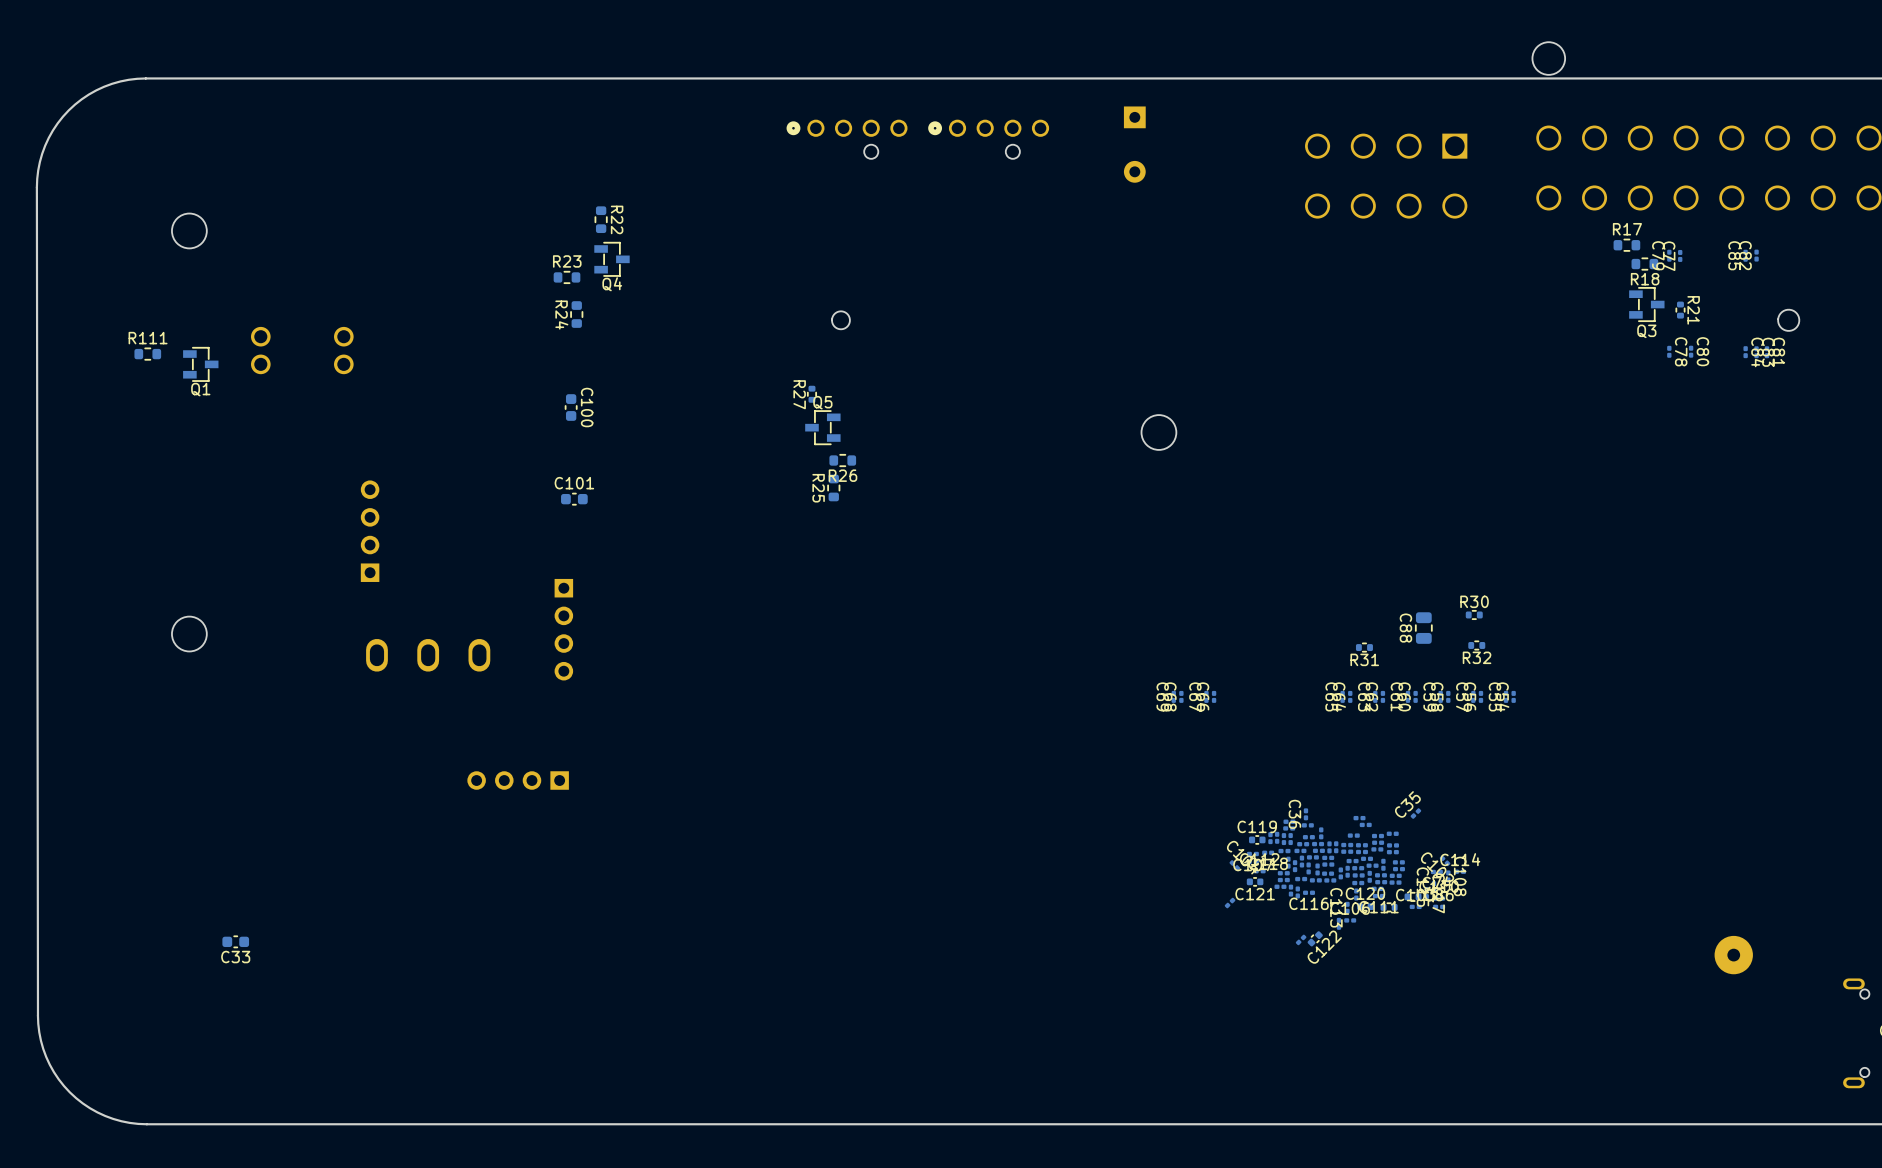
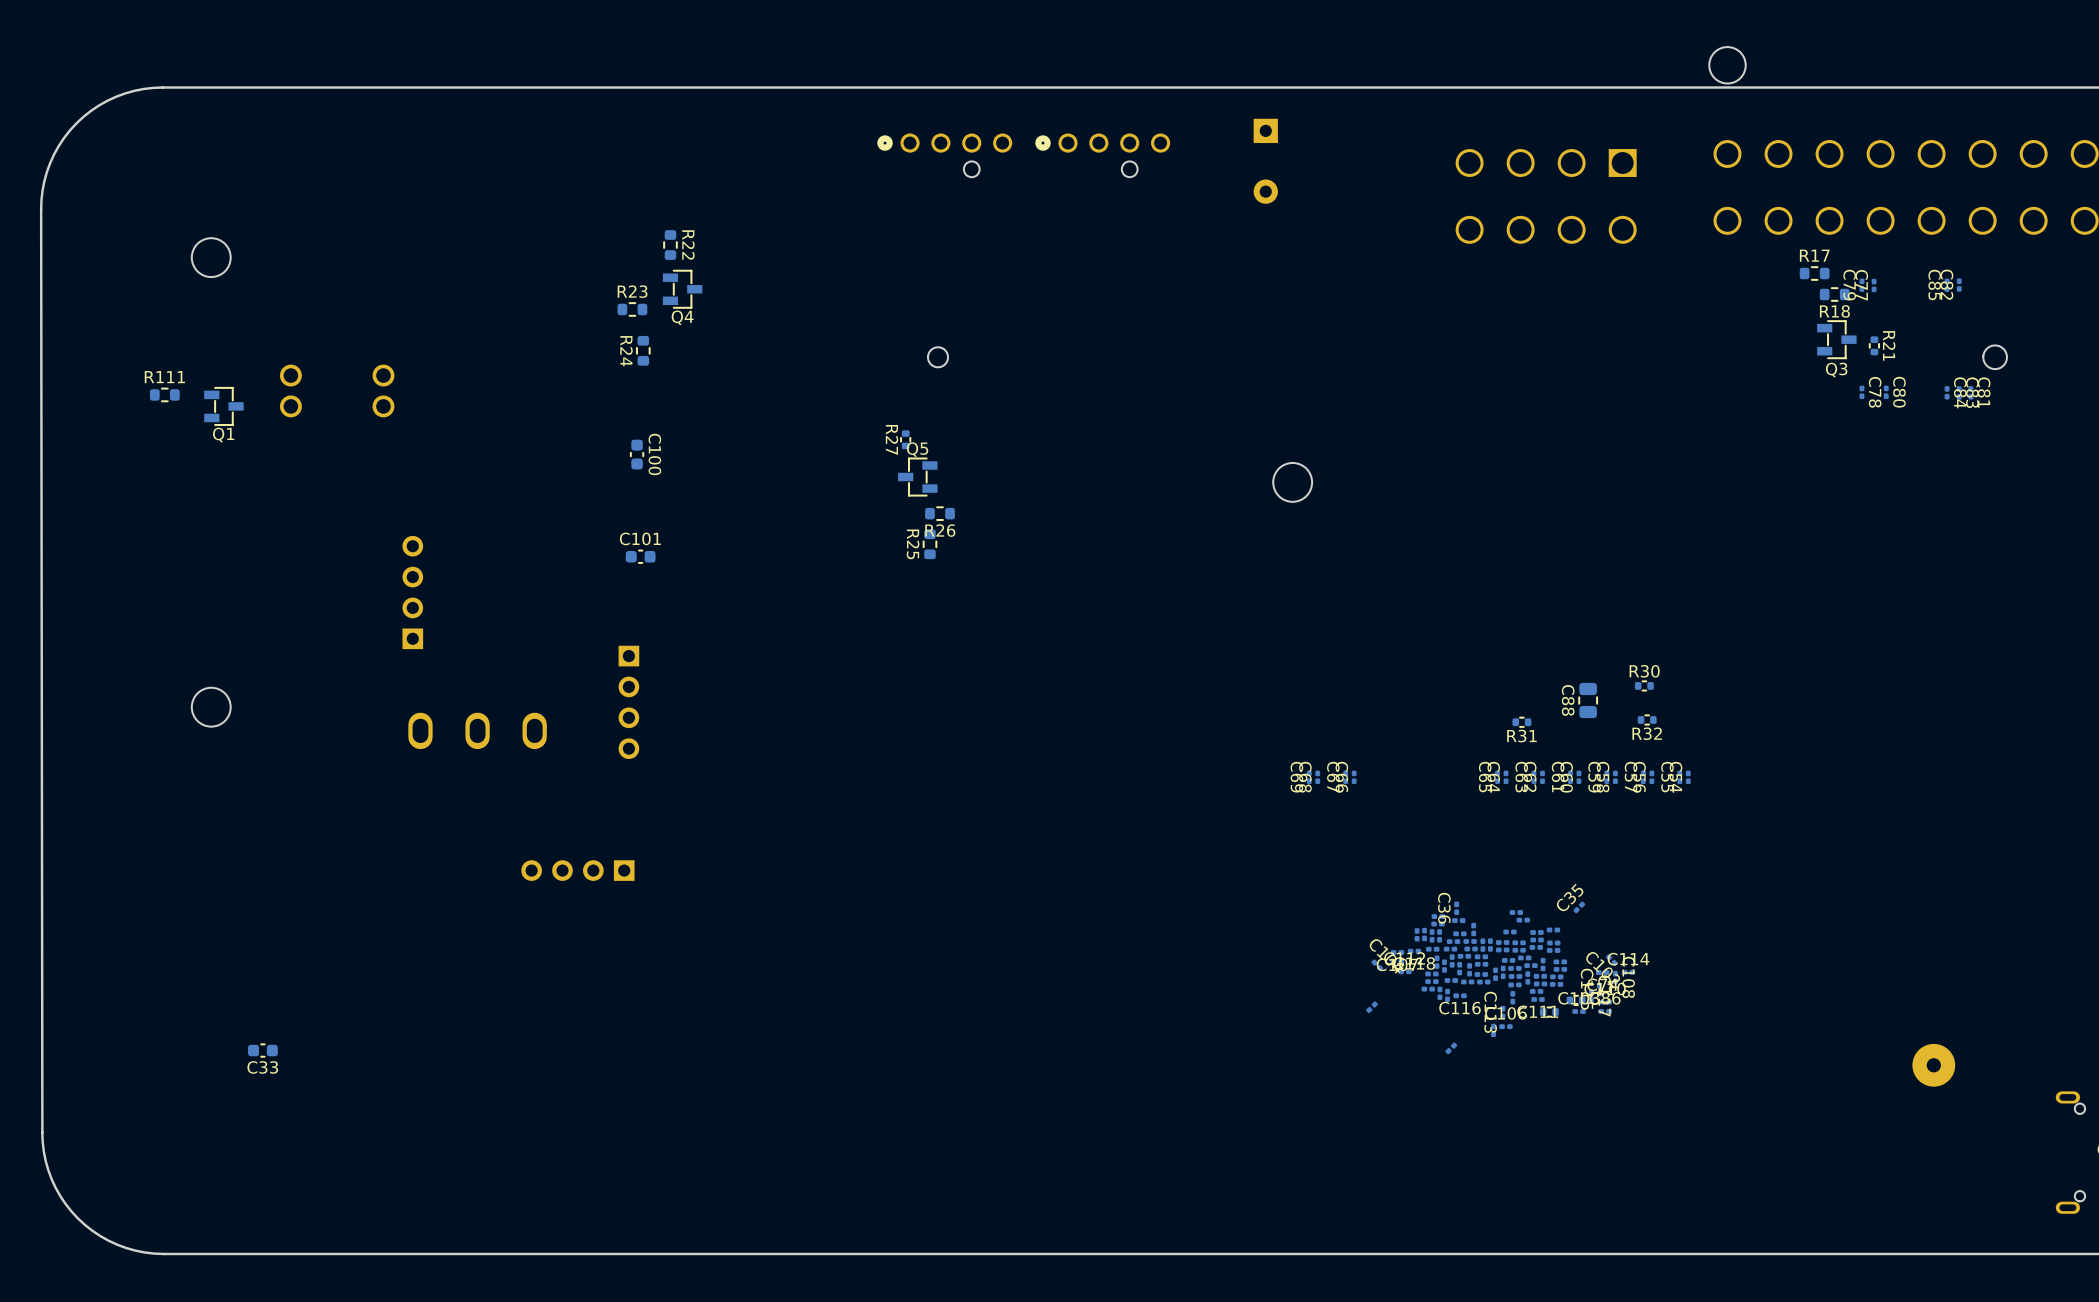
C119: (1257, 839) -> none
C121: (1255, 881) -> none
C120: (1365, 906) -> none
C122: (1315, 938) -> none

